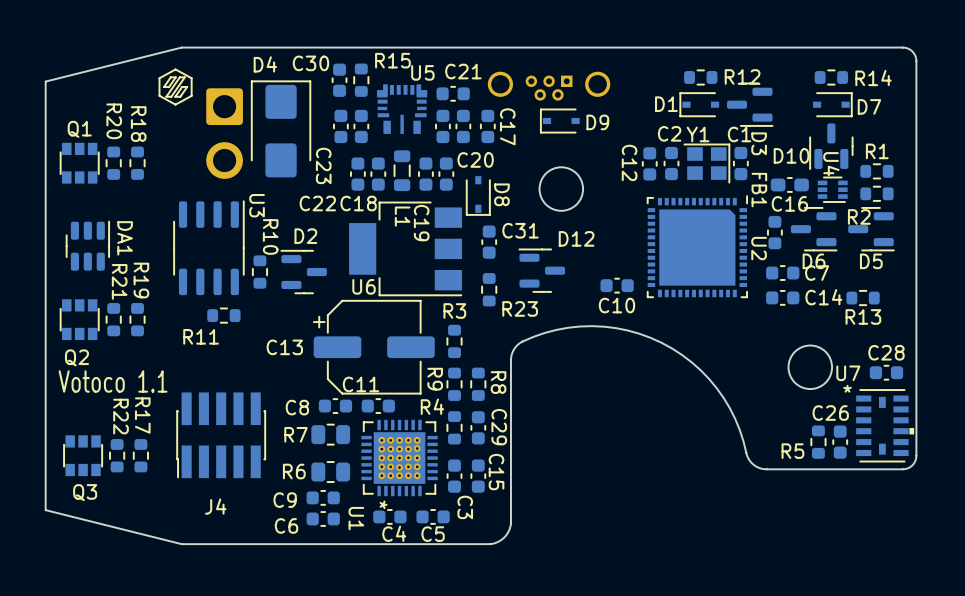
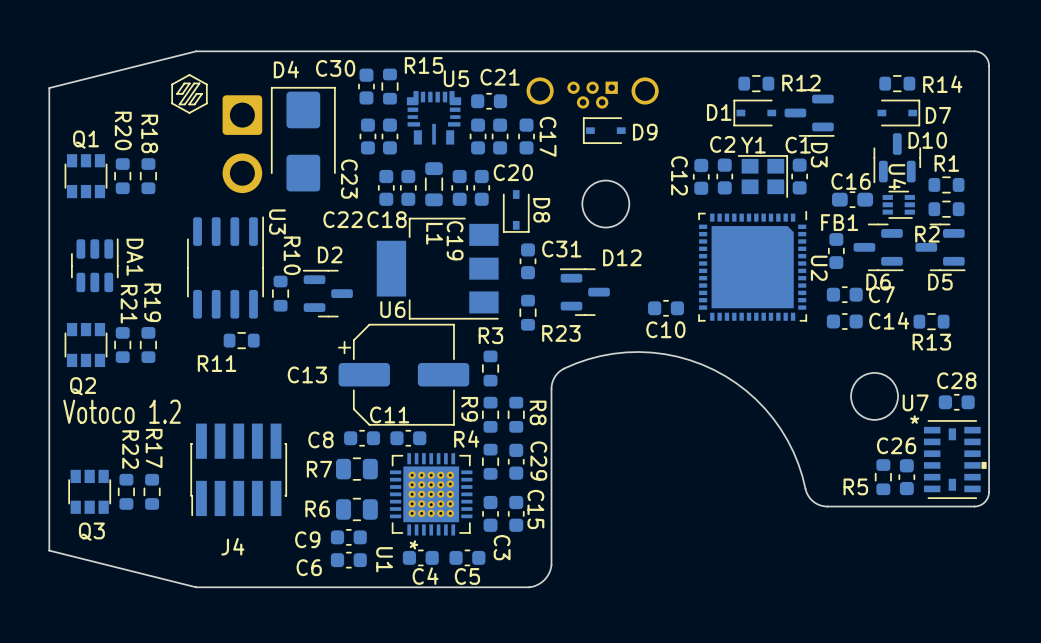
D10 name position: D10 (791, 155) -> D10 (927, 140)
FB1 name rotation: 0° (759, 190) -> 90° counterclockwise (839, 222)
C16 name position: C16 (789, 203) -> C16 (851, 181)
text: Votoco 1.1 (113, 381) -> Votoco 1.2 (122, 411)

